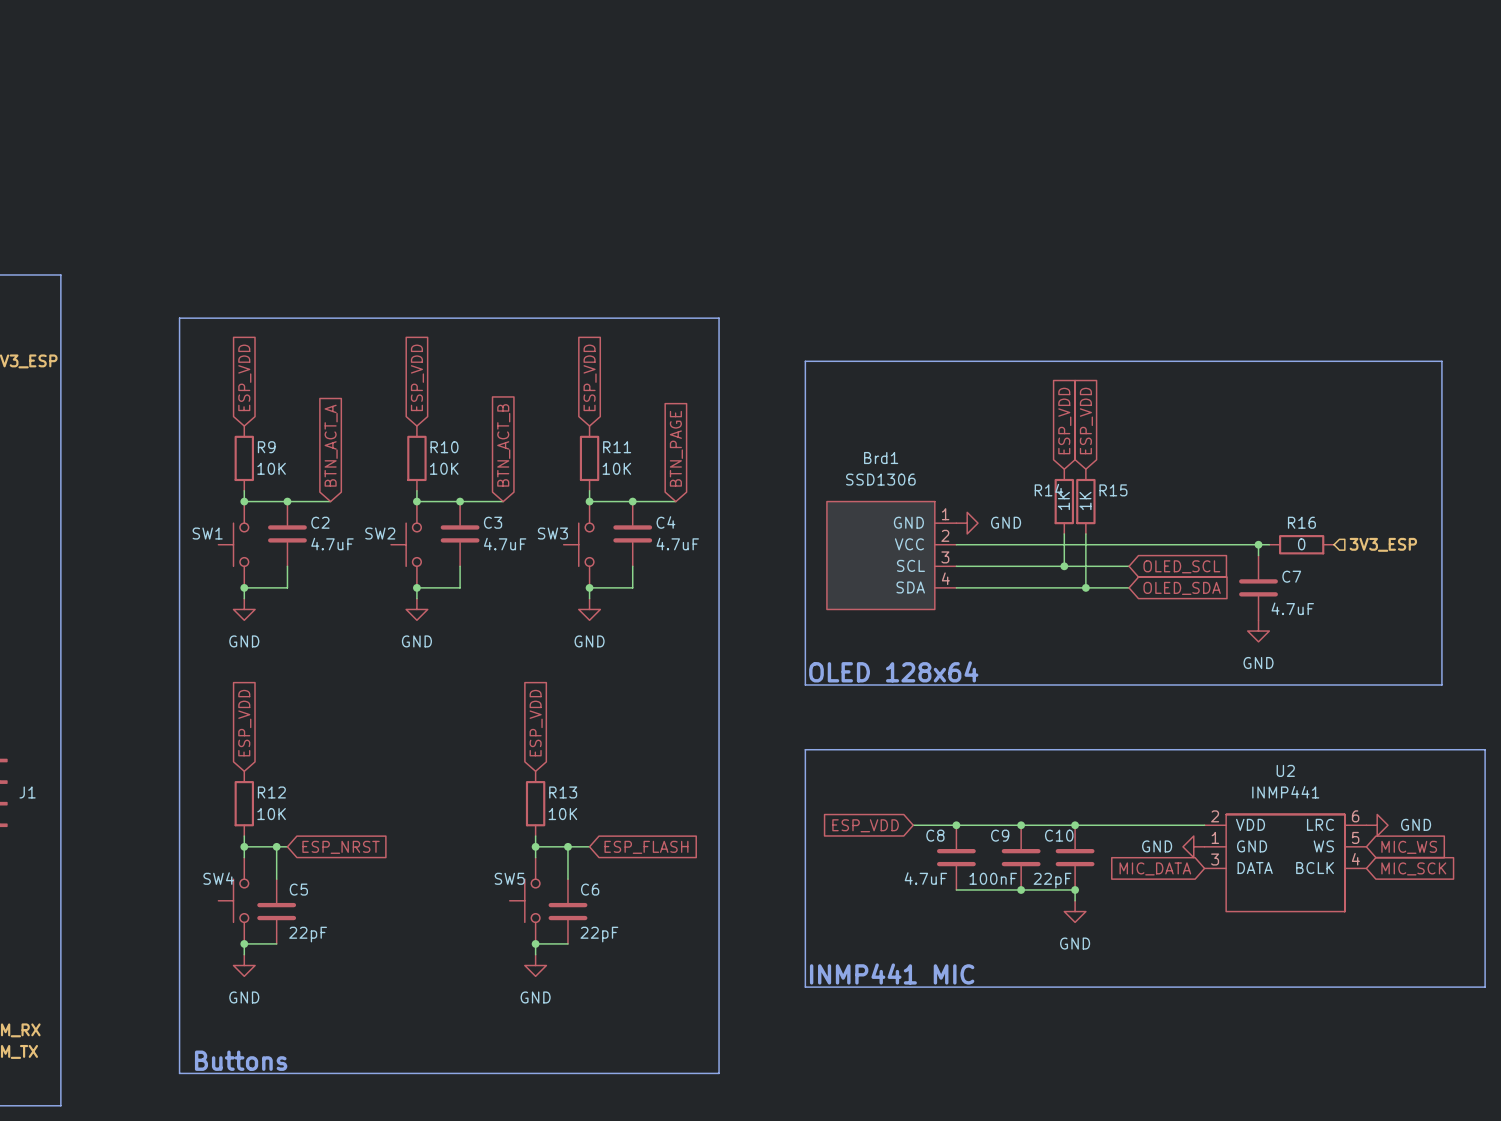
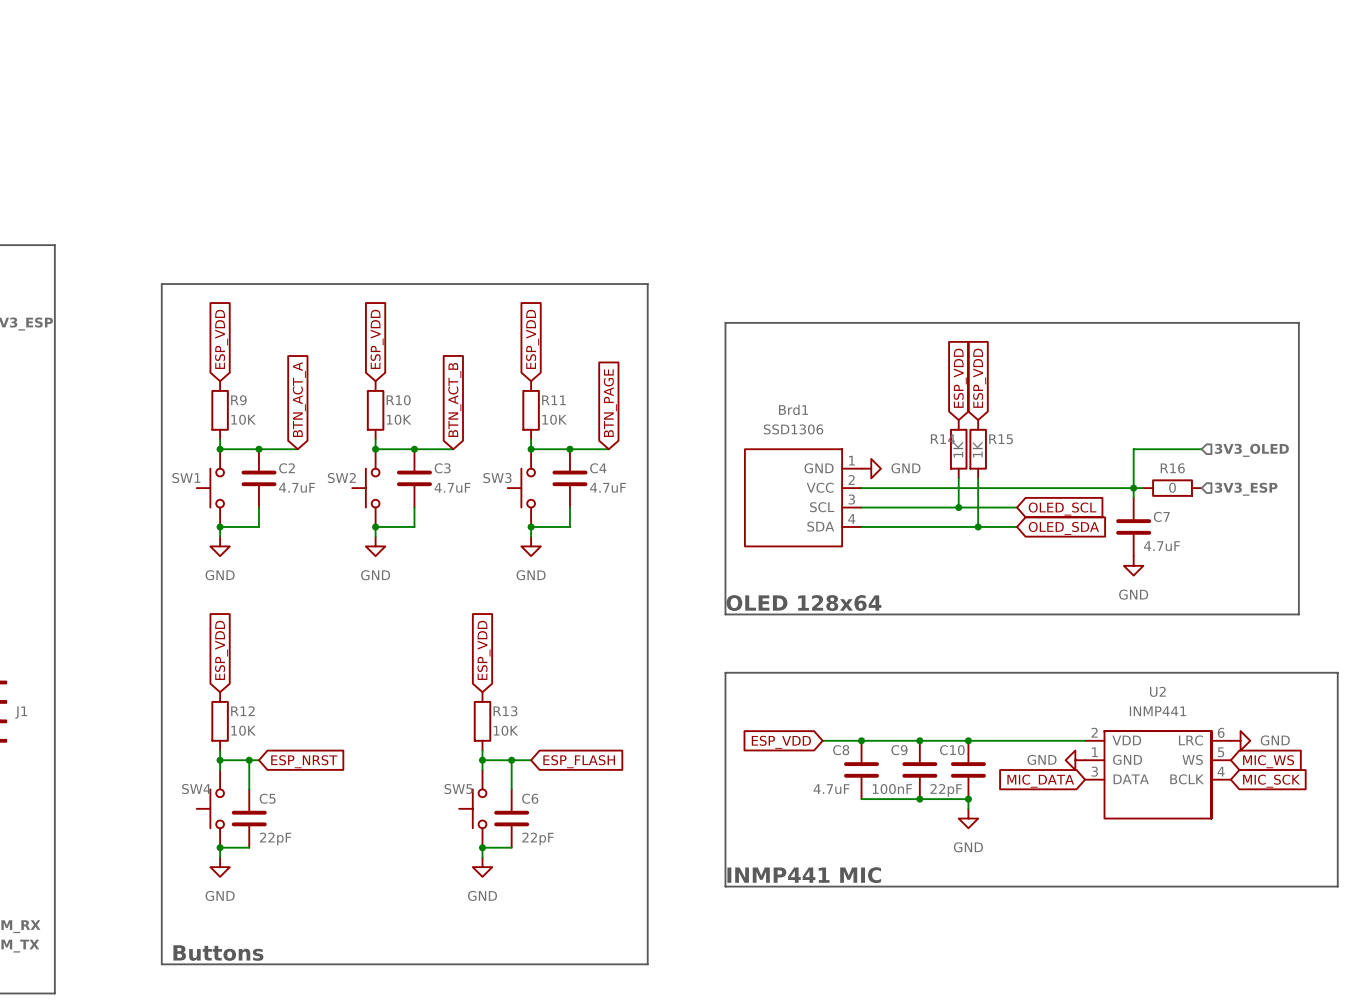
wire: none -> (1201, 449) (1133, 449) (1133, 488)
hierarchical label: none -> 3V3_OLED (1251, 450)

